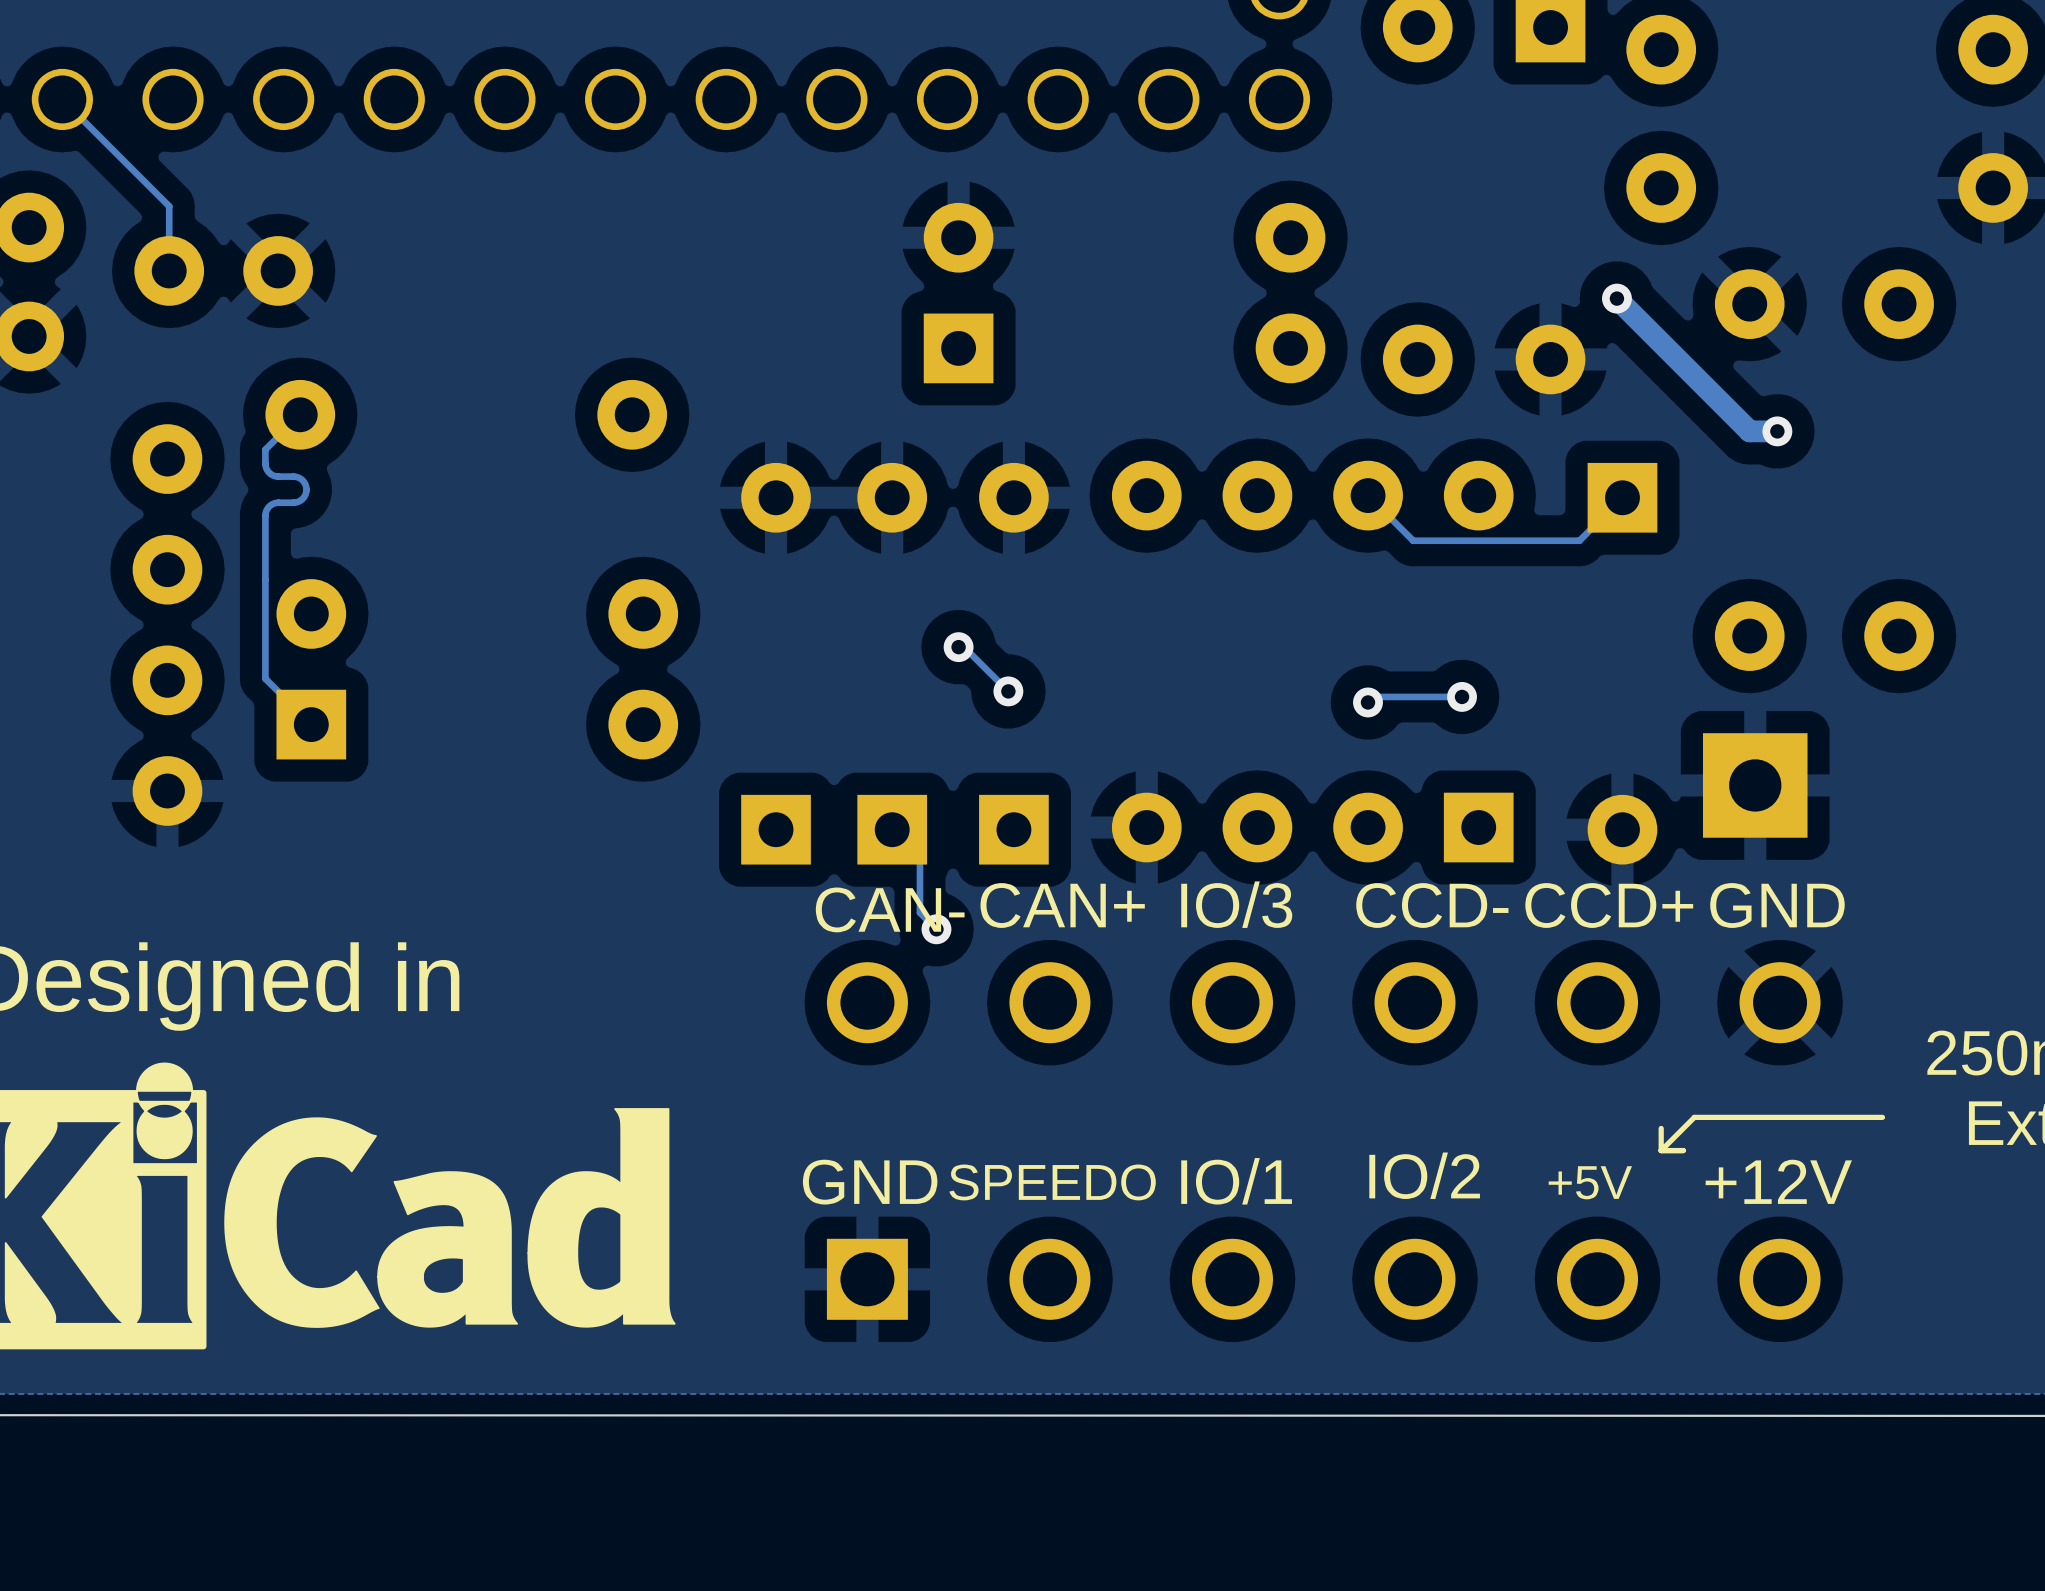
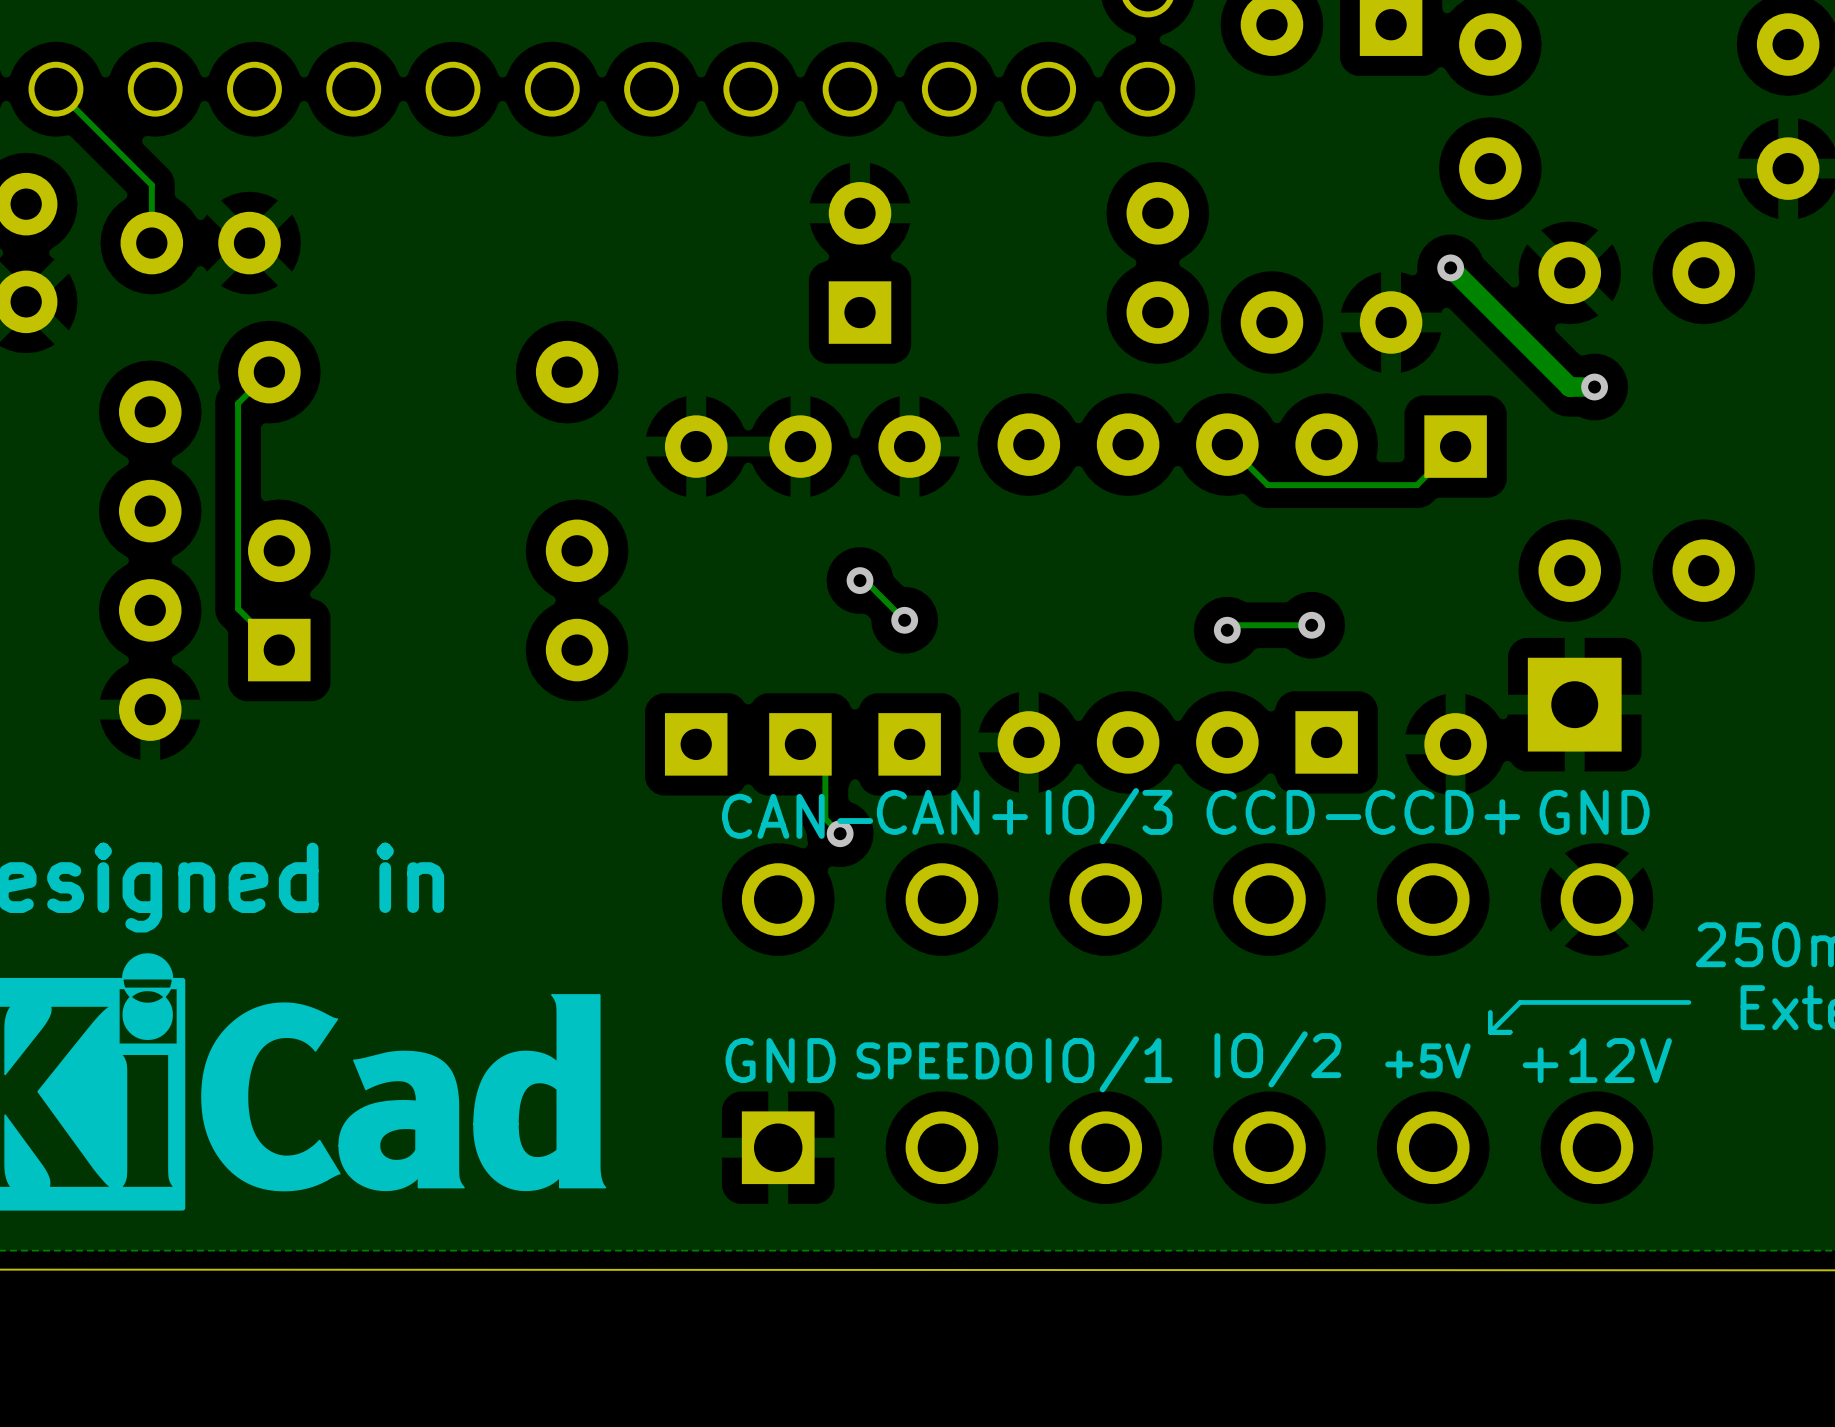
track: (265, 463) (267, 470) (271, 474) (298, 477) (303, 481) (306, 489) (304, 496) (299, 500) (273, 503) (267, 509) (265, 515) -> (238, 415) (238, 462)

